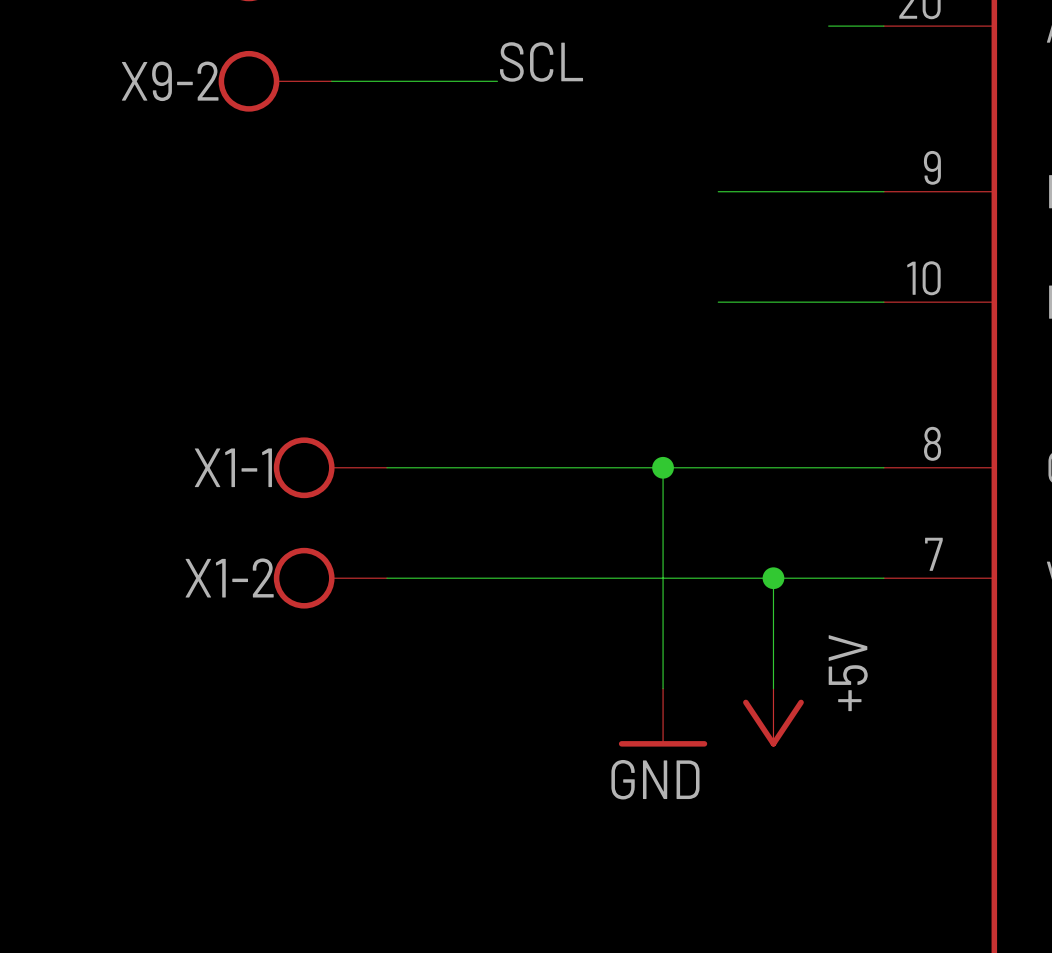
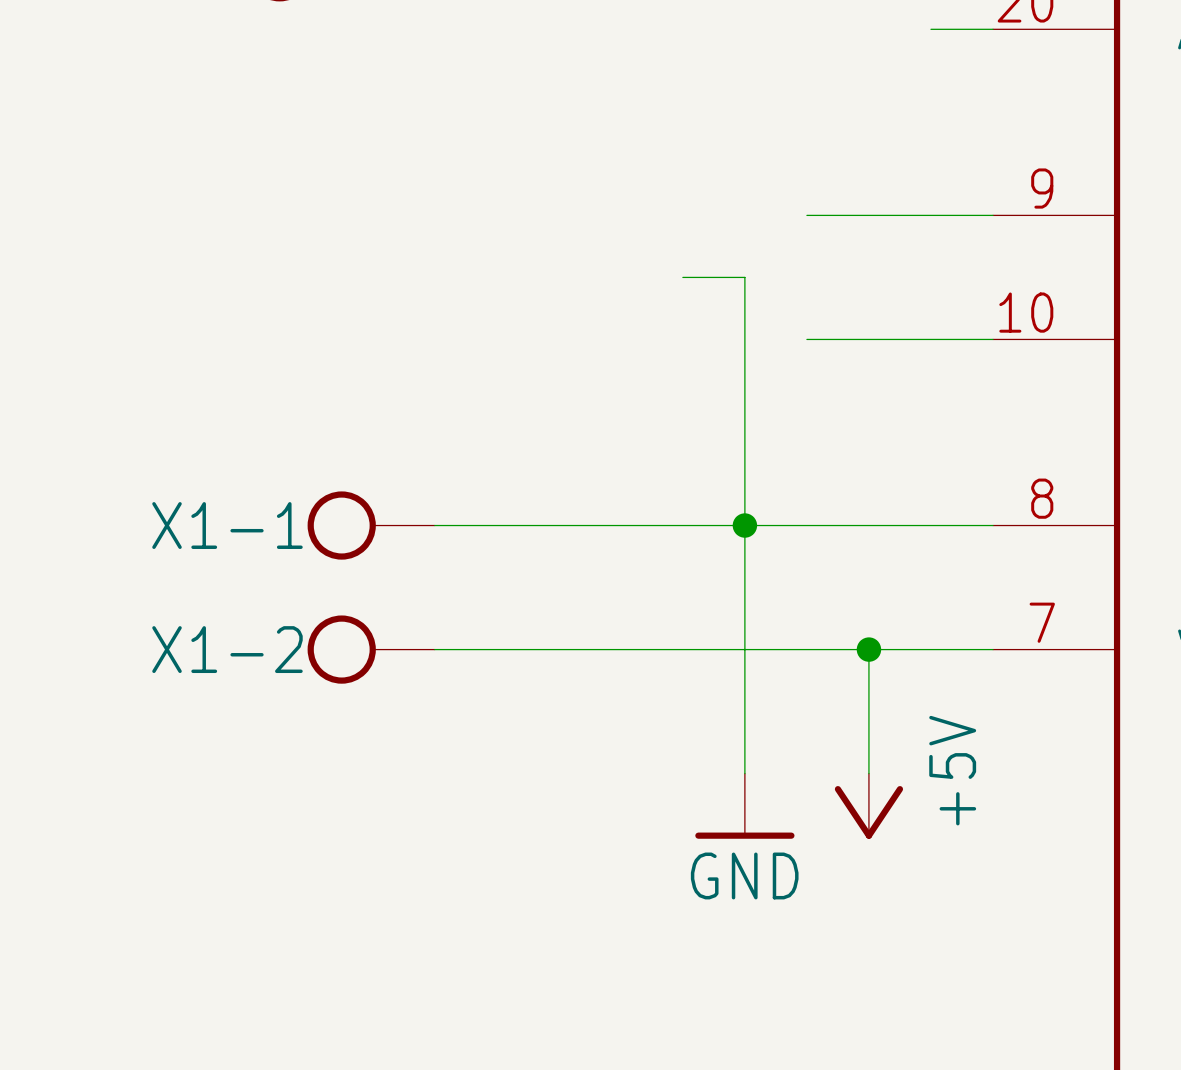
label: SCL (541, 62) -> none
X9-2: (275, 81) -> none
wire: (331, 81) (497, 81) -> none
wire: none -> (682, 277) (744, 277) (744, 525)

